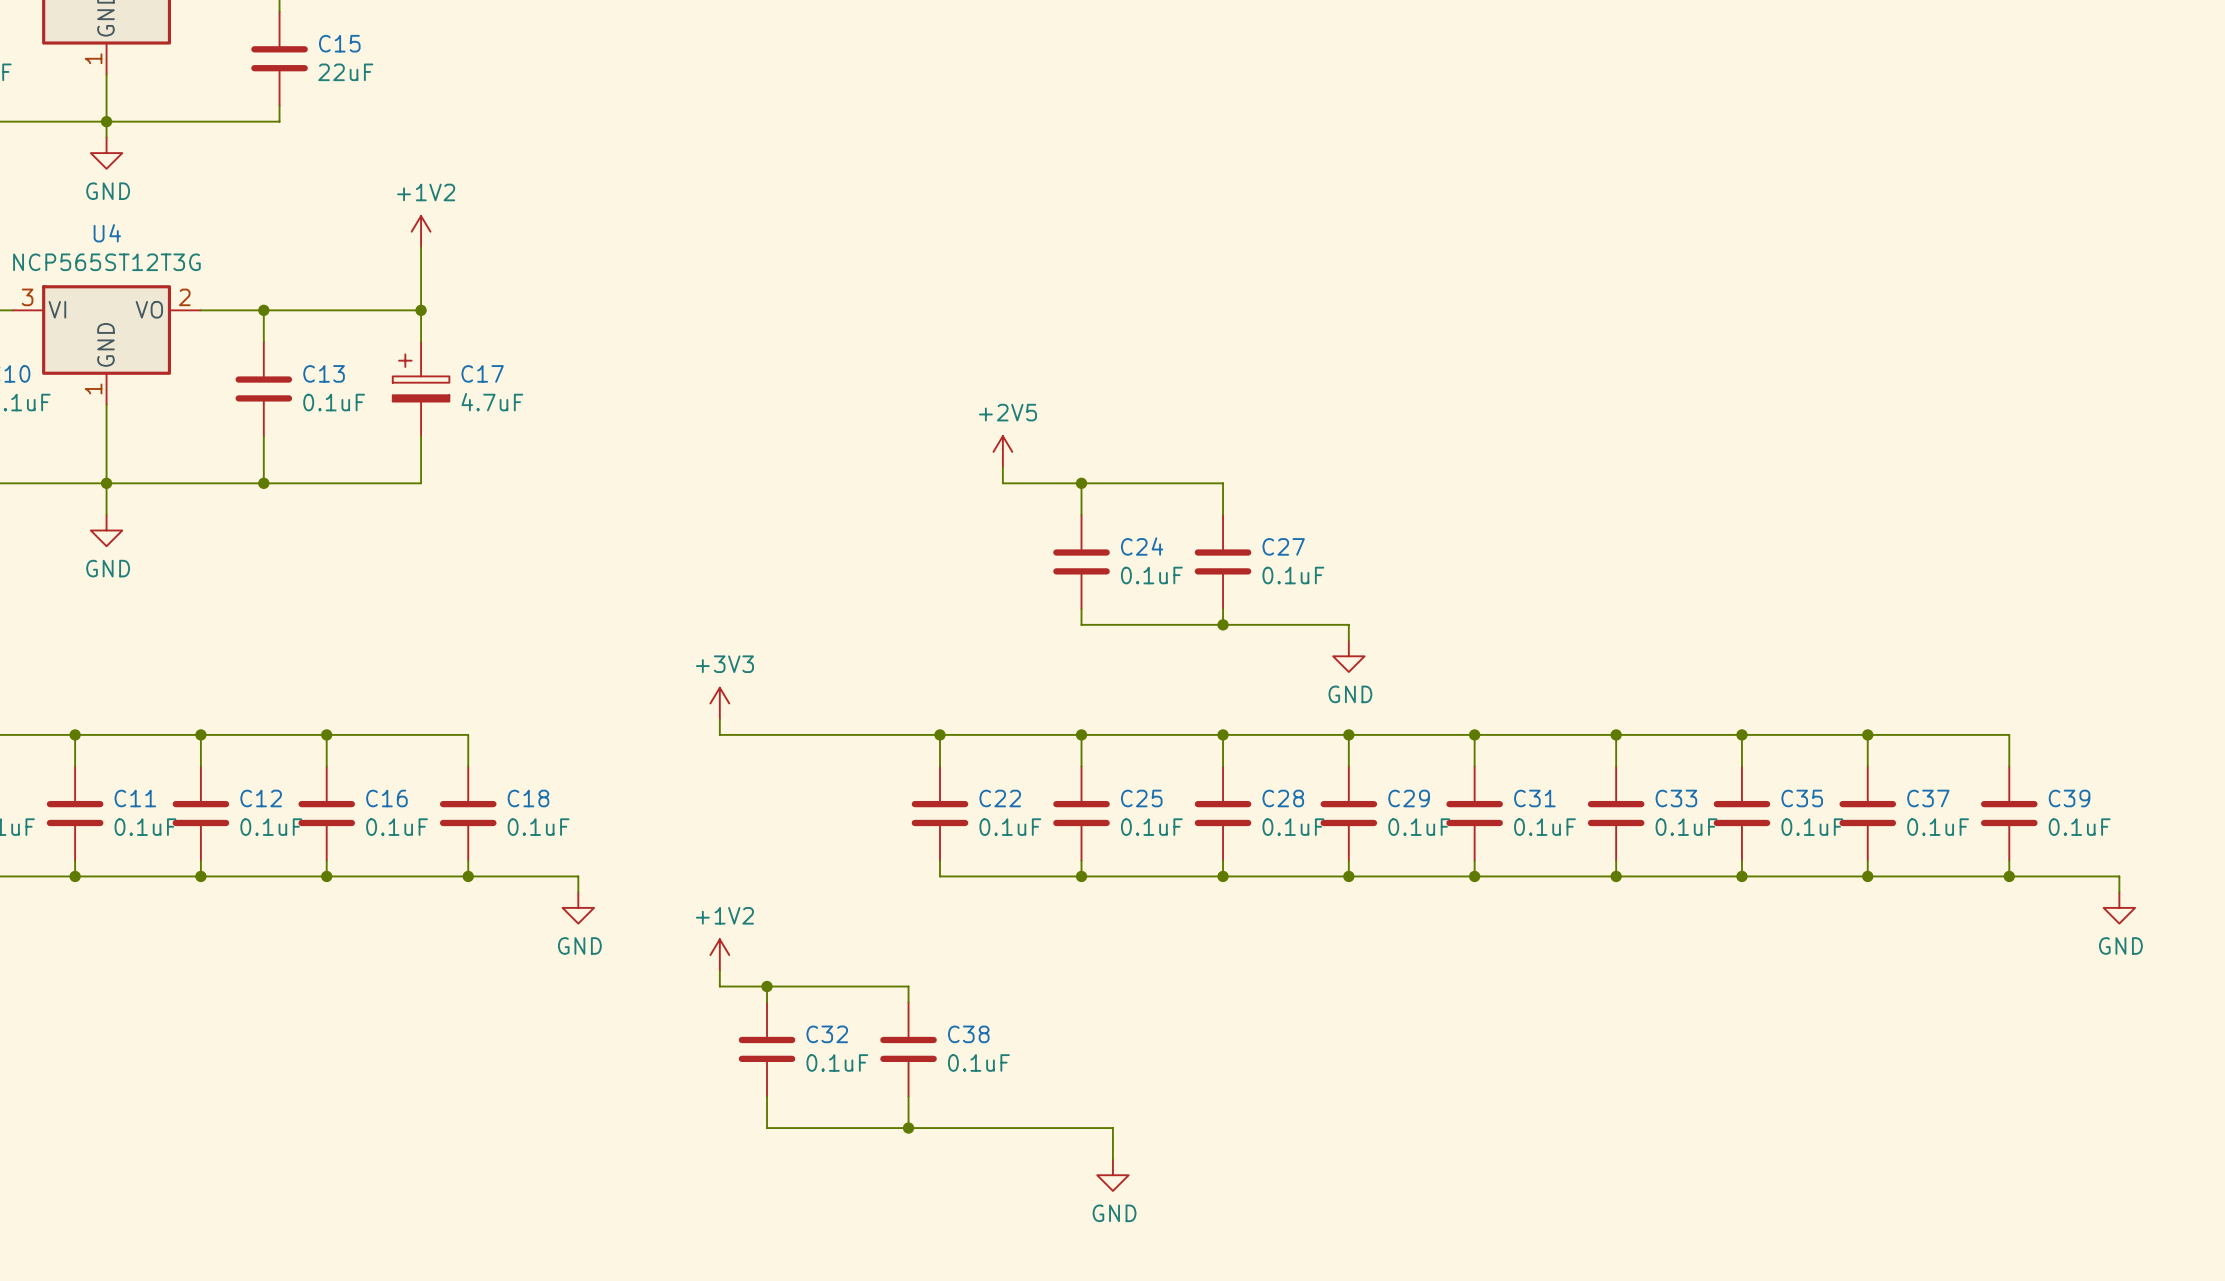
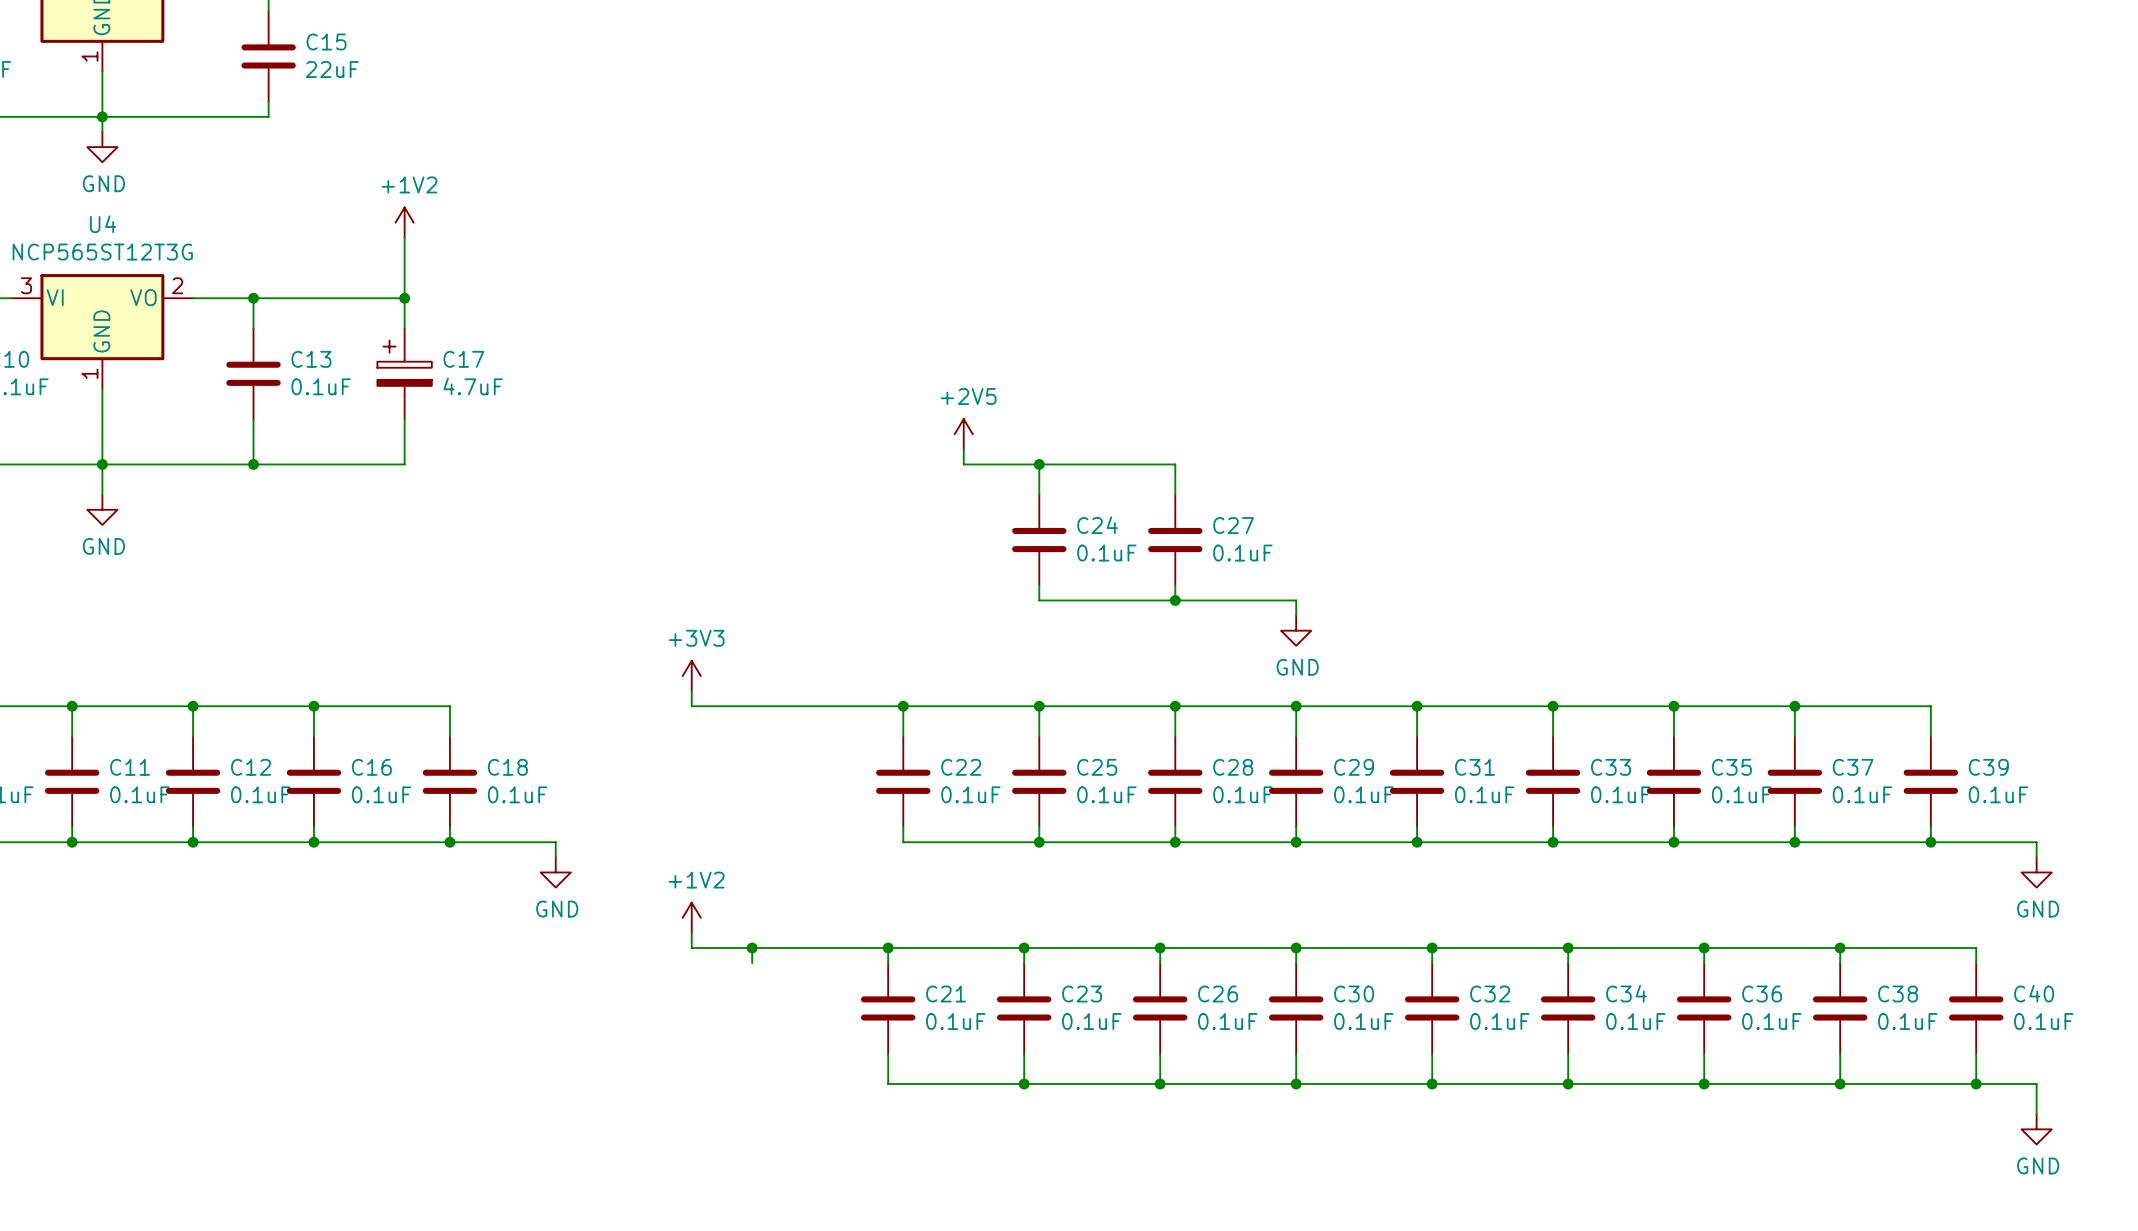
wire: (767, 986) (767, 1002) -> (752, 948) (752, 963)
junction position: (767, 986) -> (752, 948)
wire: (908, 986) (908, 1002) -> (873, 948) (1976, 948) (1976, 963)
wire: none -> (888, 948) (888, 963)
junction: none -> (888, 948)
wire: none -> (1024, 948) (1024, 963)
junction: none -> (1024, 948)
wire: none -> (1160, 948) (1160, 963)
junction: none -> (1160, 948)
wire: none -> (1296, 948) (1296, 963)
junction: none -> (1296, 948)
wire: none -> (1432, 948) (1432, 963)
junction: none -> (1432, 948)
wire: none -> (1568, 948) (1568, 963)
junction: none -> (1568, 948)
wire: none -> (1704, 948) (1704, 963)
junction: none -> (1704, 948)
wire: none -> (1840, 948) (1840, 963)
junction: none -> (1840, 948)
C32 position: (767, 1049) -> (1432, 1008)
C38 position: (908, 1049) -> (1840, 1008)
C21: none -> 0.1uF (888, 1008)
C23: none -> 0.1uF (1024, 1008)
C26: none -> 0.1uF (1160, 1008)
C30: none -> 0.1uF (1296, 1008)
C34: none -> 0.1uF (1568, 1008)
C36: none -> 0.1uF (1704, 1008)
C40: none -> 0.1uF (1976, 1008)
wire: (767, 1096) (767, 1128) (924, 1128) -> (888, 1053) (888, 1084)
wire: (908, 1096) (908, 1128) -> (1024, 1053) (1024, 1084)
wire: none -> (1160, 1053) (1160, 1084)
wire: none -> (1296, 1053) (1296, 1084)
wire: none -> (1432, 1053) (1432, 1084)
wire: none -> (1568, 1053) (1568, 1084)
wire: none -> (1704, 1053) (1704, 1084)
wire: none -> (1840, 1053) (1840, 1084)
wire: none -> (1976, 1053) (1976, 1084)
junction: (908, 1128) -> none
junction: none -> (1024, 1084)
wire: (1112, 1128) (1112, 1159) -> (1069, 1084) (2036, 1084) (2036, 1114)
junction: none -> (1160, 1084)
junction: none -> (1296, 1084)
junction: none -> (1432, 1084)
junction: none -> (1568, 1084)
junction: none -> (1704, 1084)
junction: none -> (1840, 1084)
junction: none -> (1976, 1084)
power symbol: GND (1112, 1175) -> none
power symbol: none -> GND (2036, 1129)

